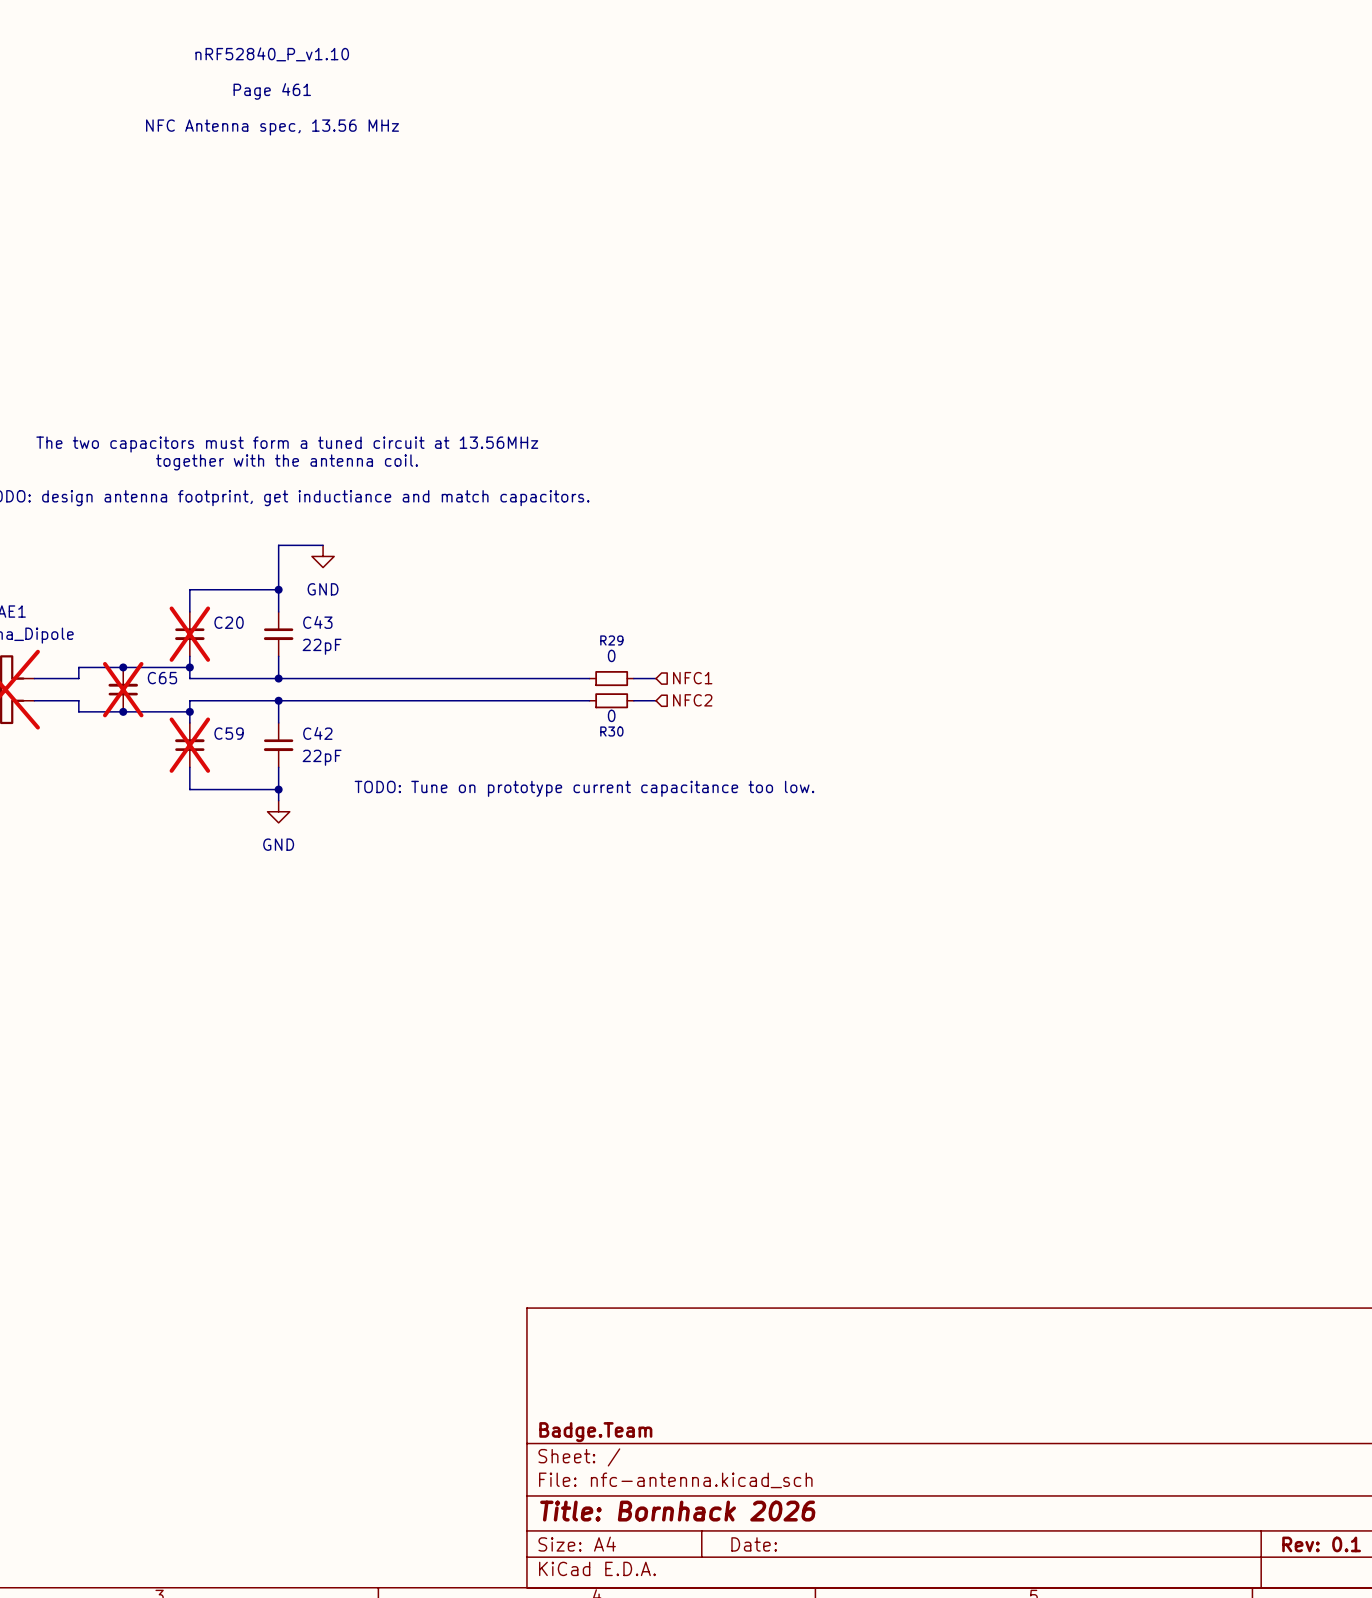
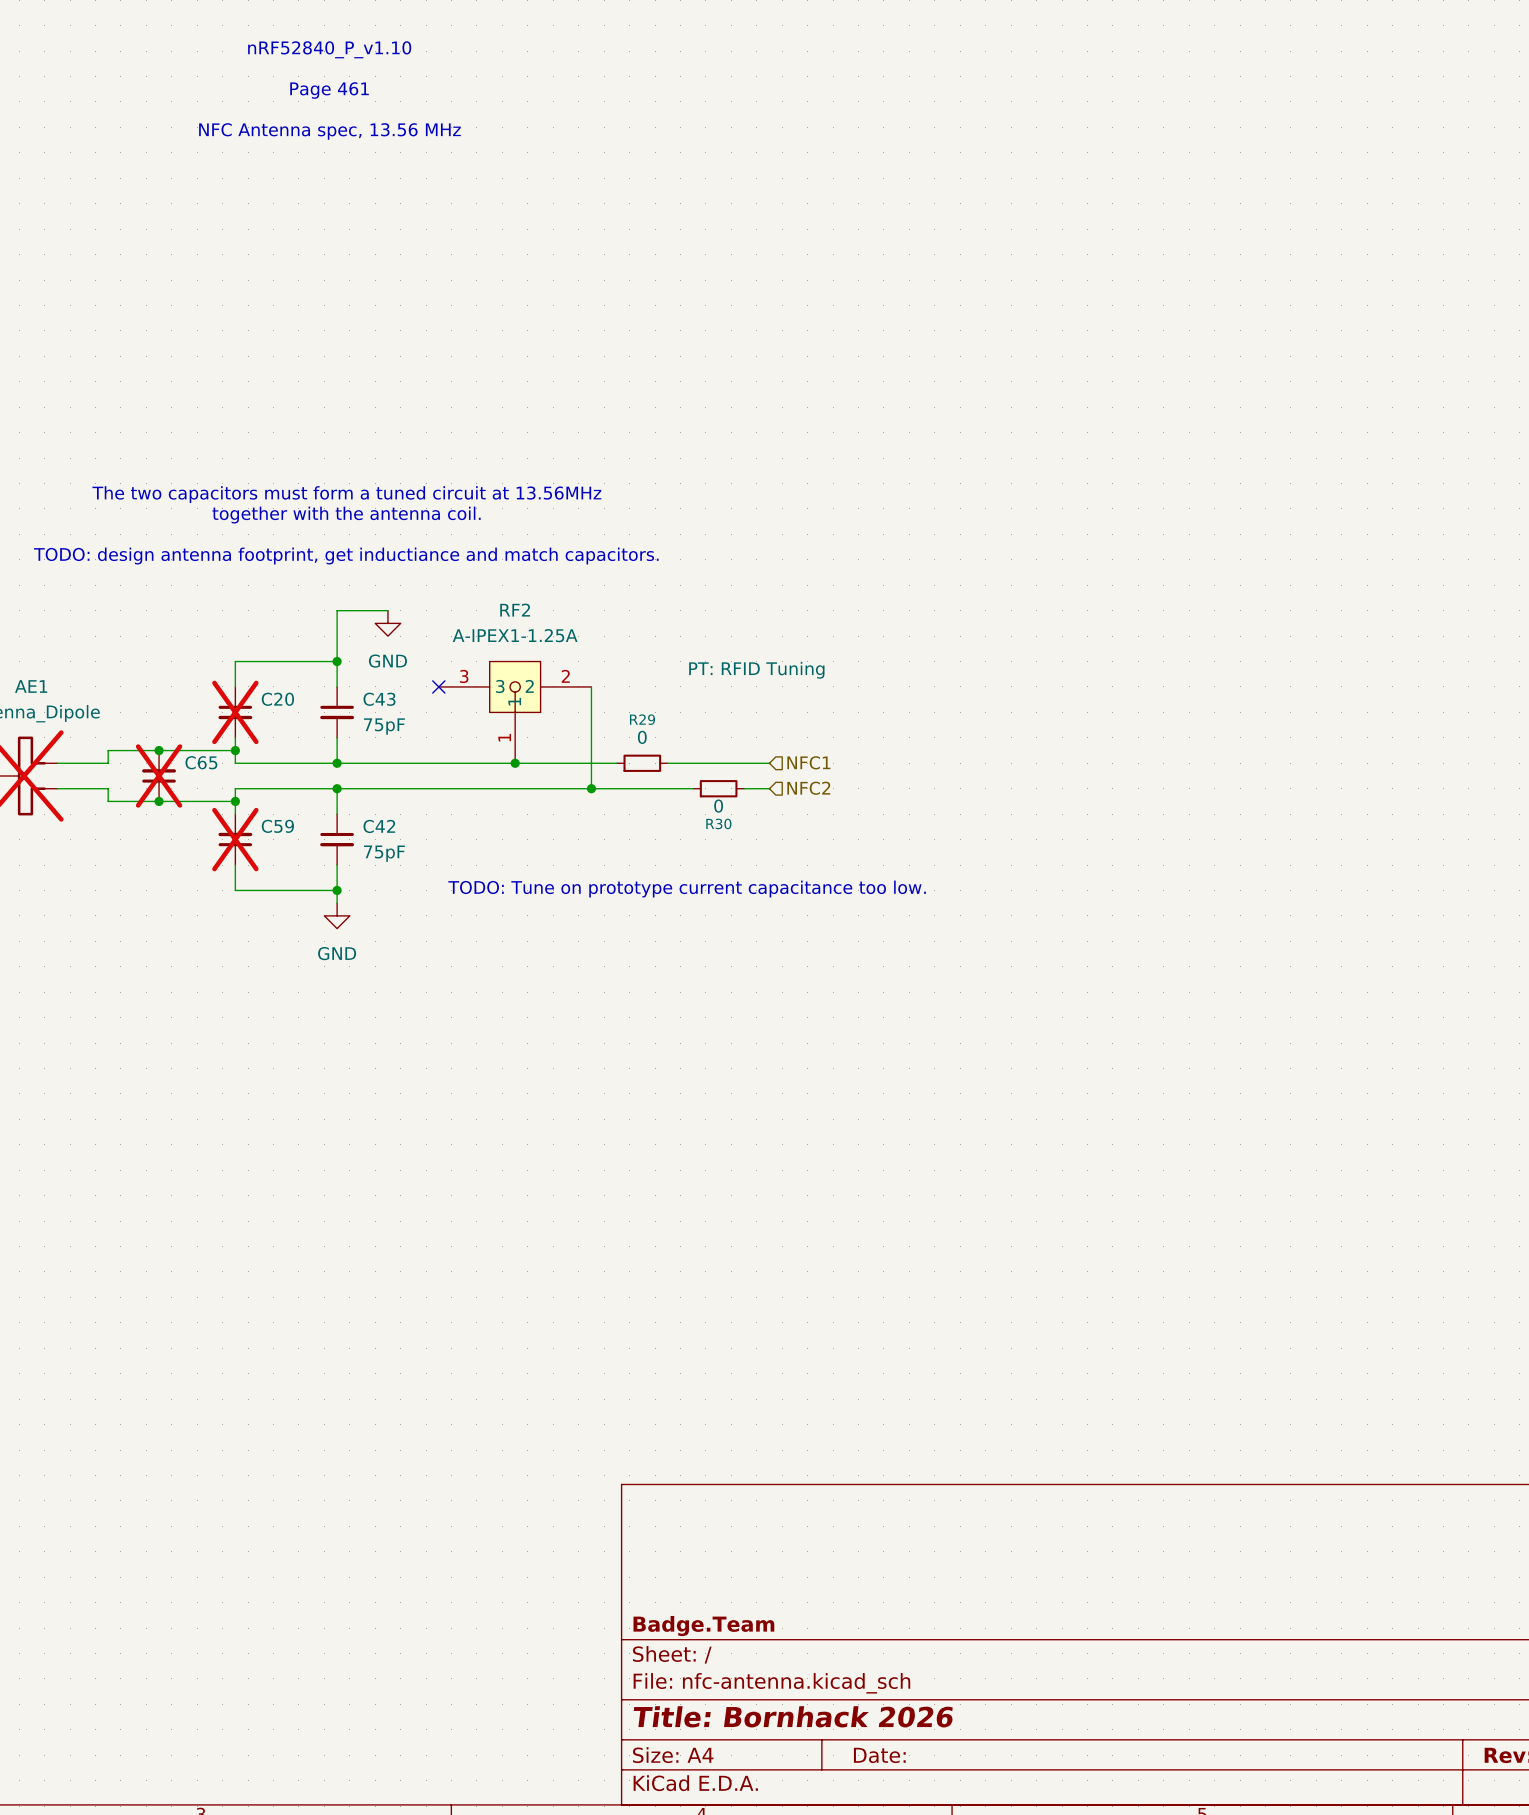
no-connect mark: none -> (438, 686)
wire: none -> (591, 686) (591, 788)
RF2: none -> A-IPEX1-1.25A (515, 712)
C43 value: 22pF (322, 646) -> 75pF (384, 726)
junction: none -> (515, 763)
wire: (522, 678) (567, 678) -> (693, 763) (744, 763)
R29 position: (611, 678) -> (642, 763)
junction: none -> (591, 788)
C42 value: 22pF (322, 757) -> 75pF (384, 853)

